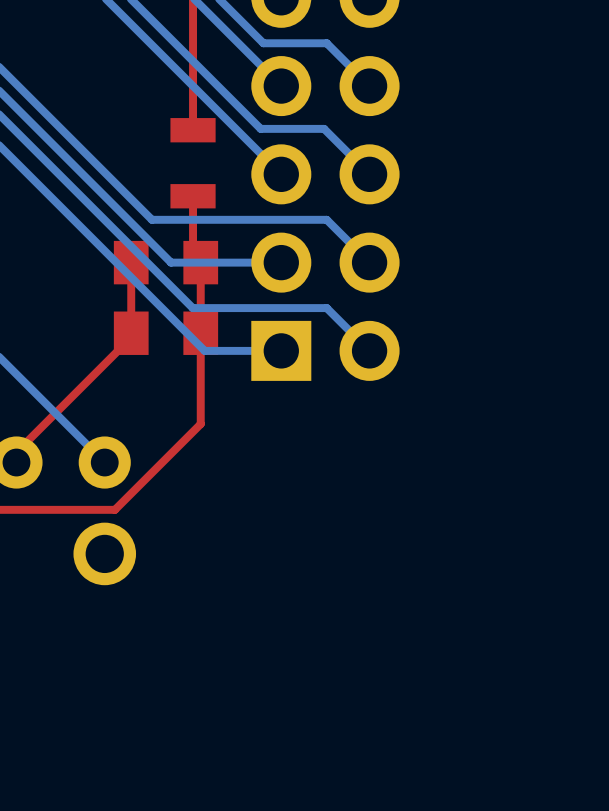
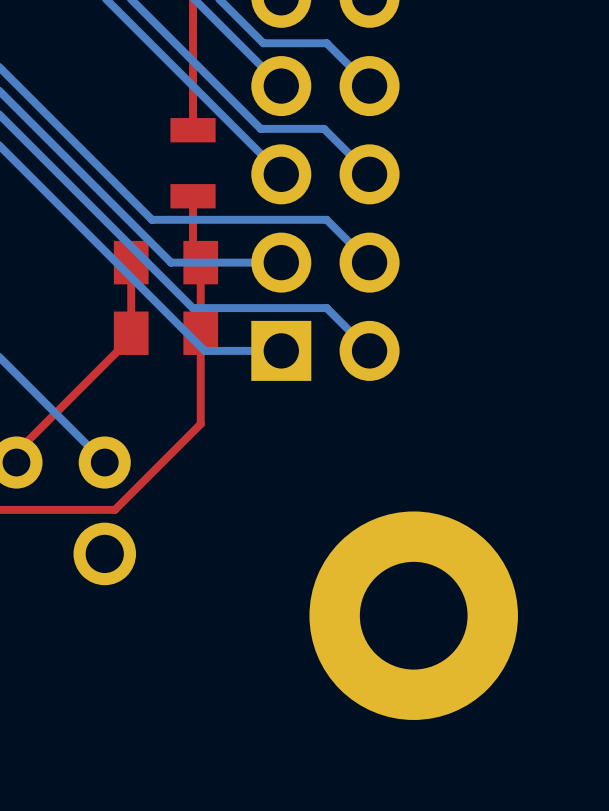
part: none -> (413, 615)

